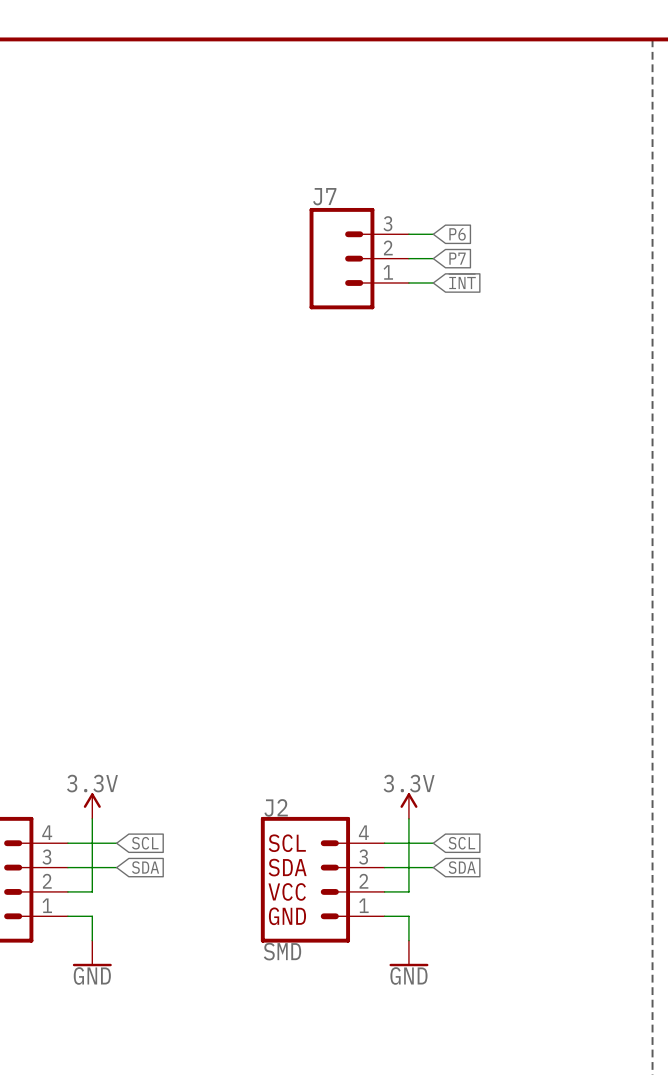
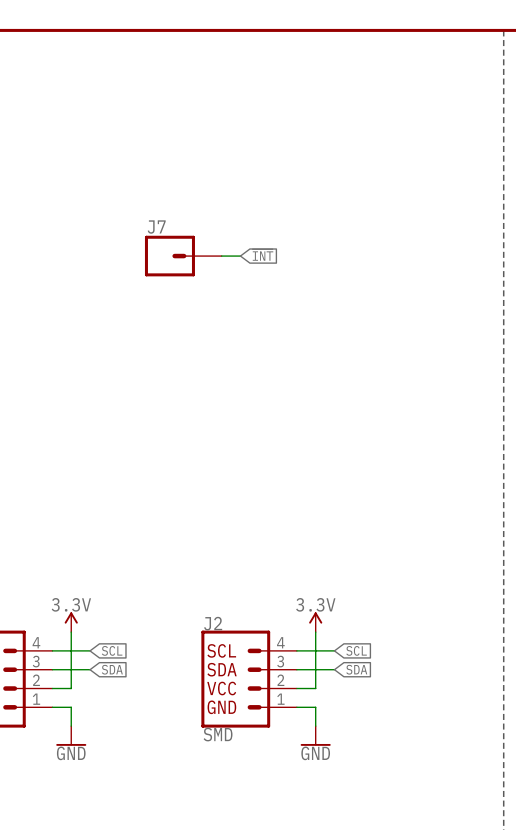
J7 name position: J7 (324, 196) -> J7 (156, 227)
J7 symbol: [309, 207, 409, 310] -> [144, 235, 222, 277]
wire: (408, 234) (433, 234) -> none
global label: P6 (457, 234) -> none
wire: (408, 258) (433, 258) -> none
global label: P7 (457, 258) -> none
global label position: ~{INT} (462, 281) -> ~{INT} (262, 254)
wire: (408, 283) (433, 283) -> (221, 256) (240, 256)

